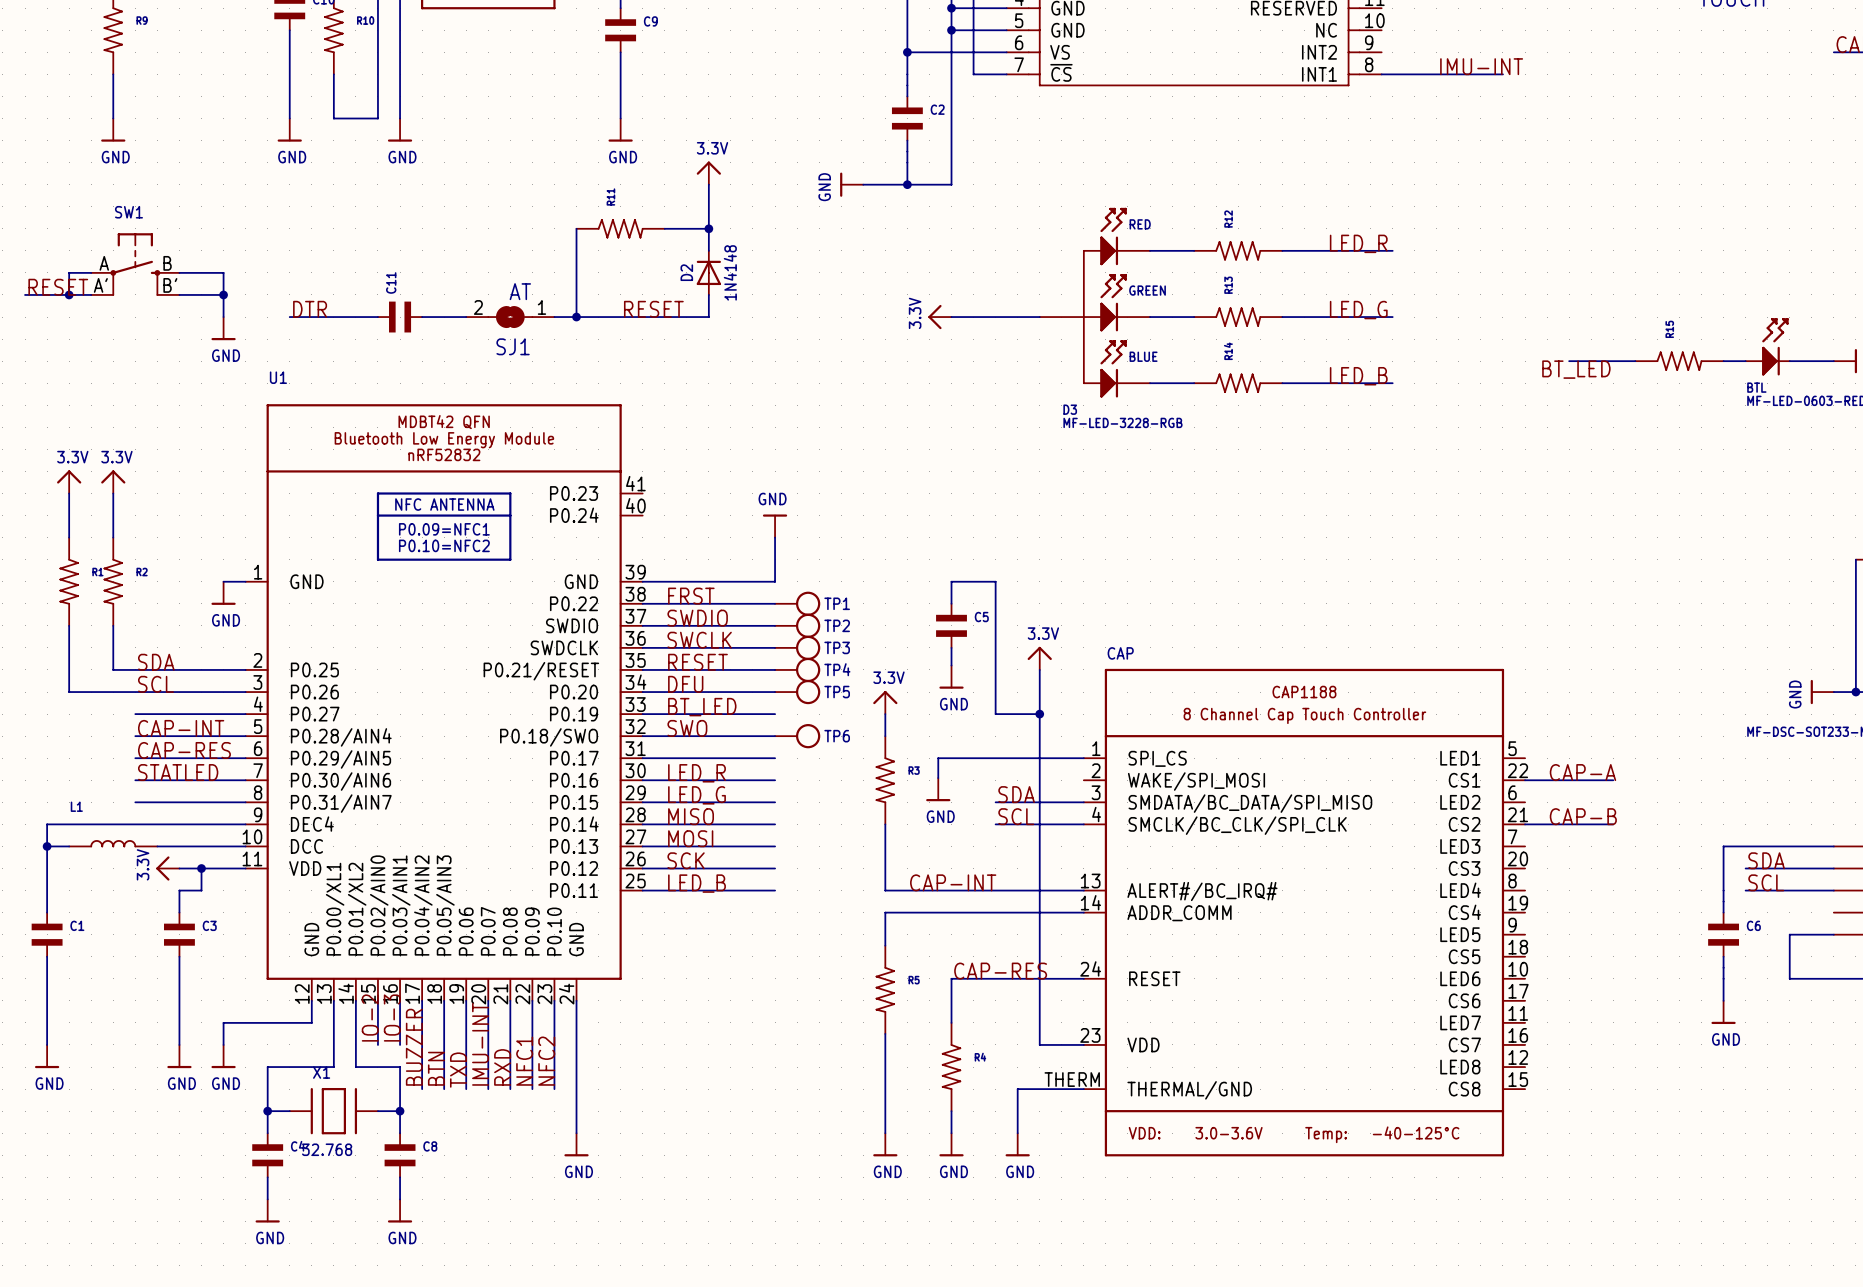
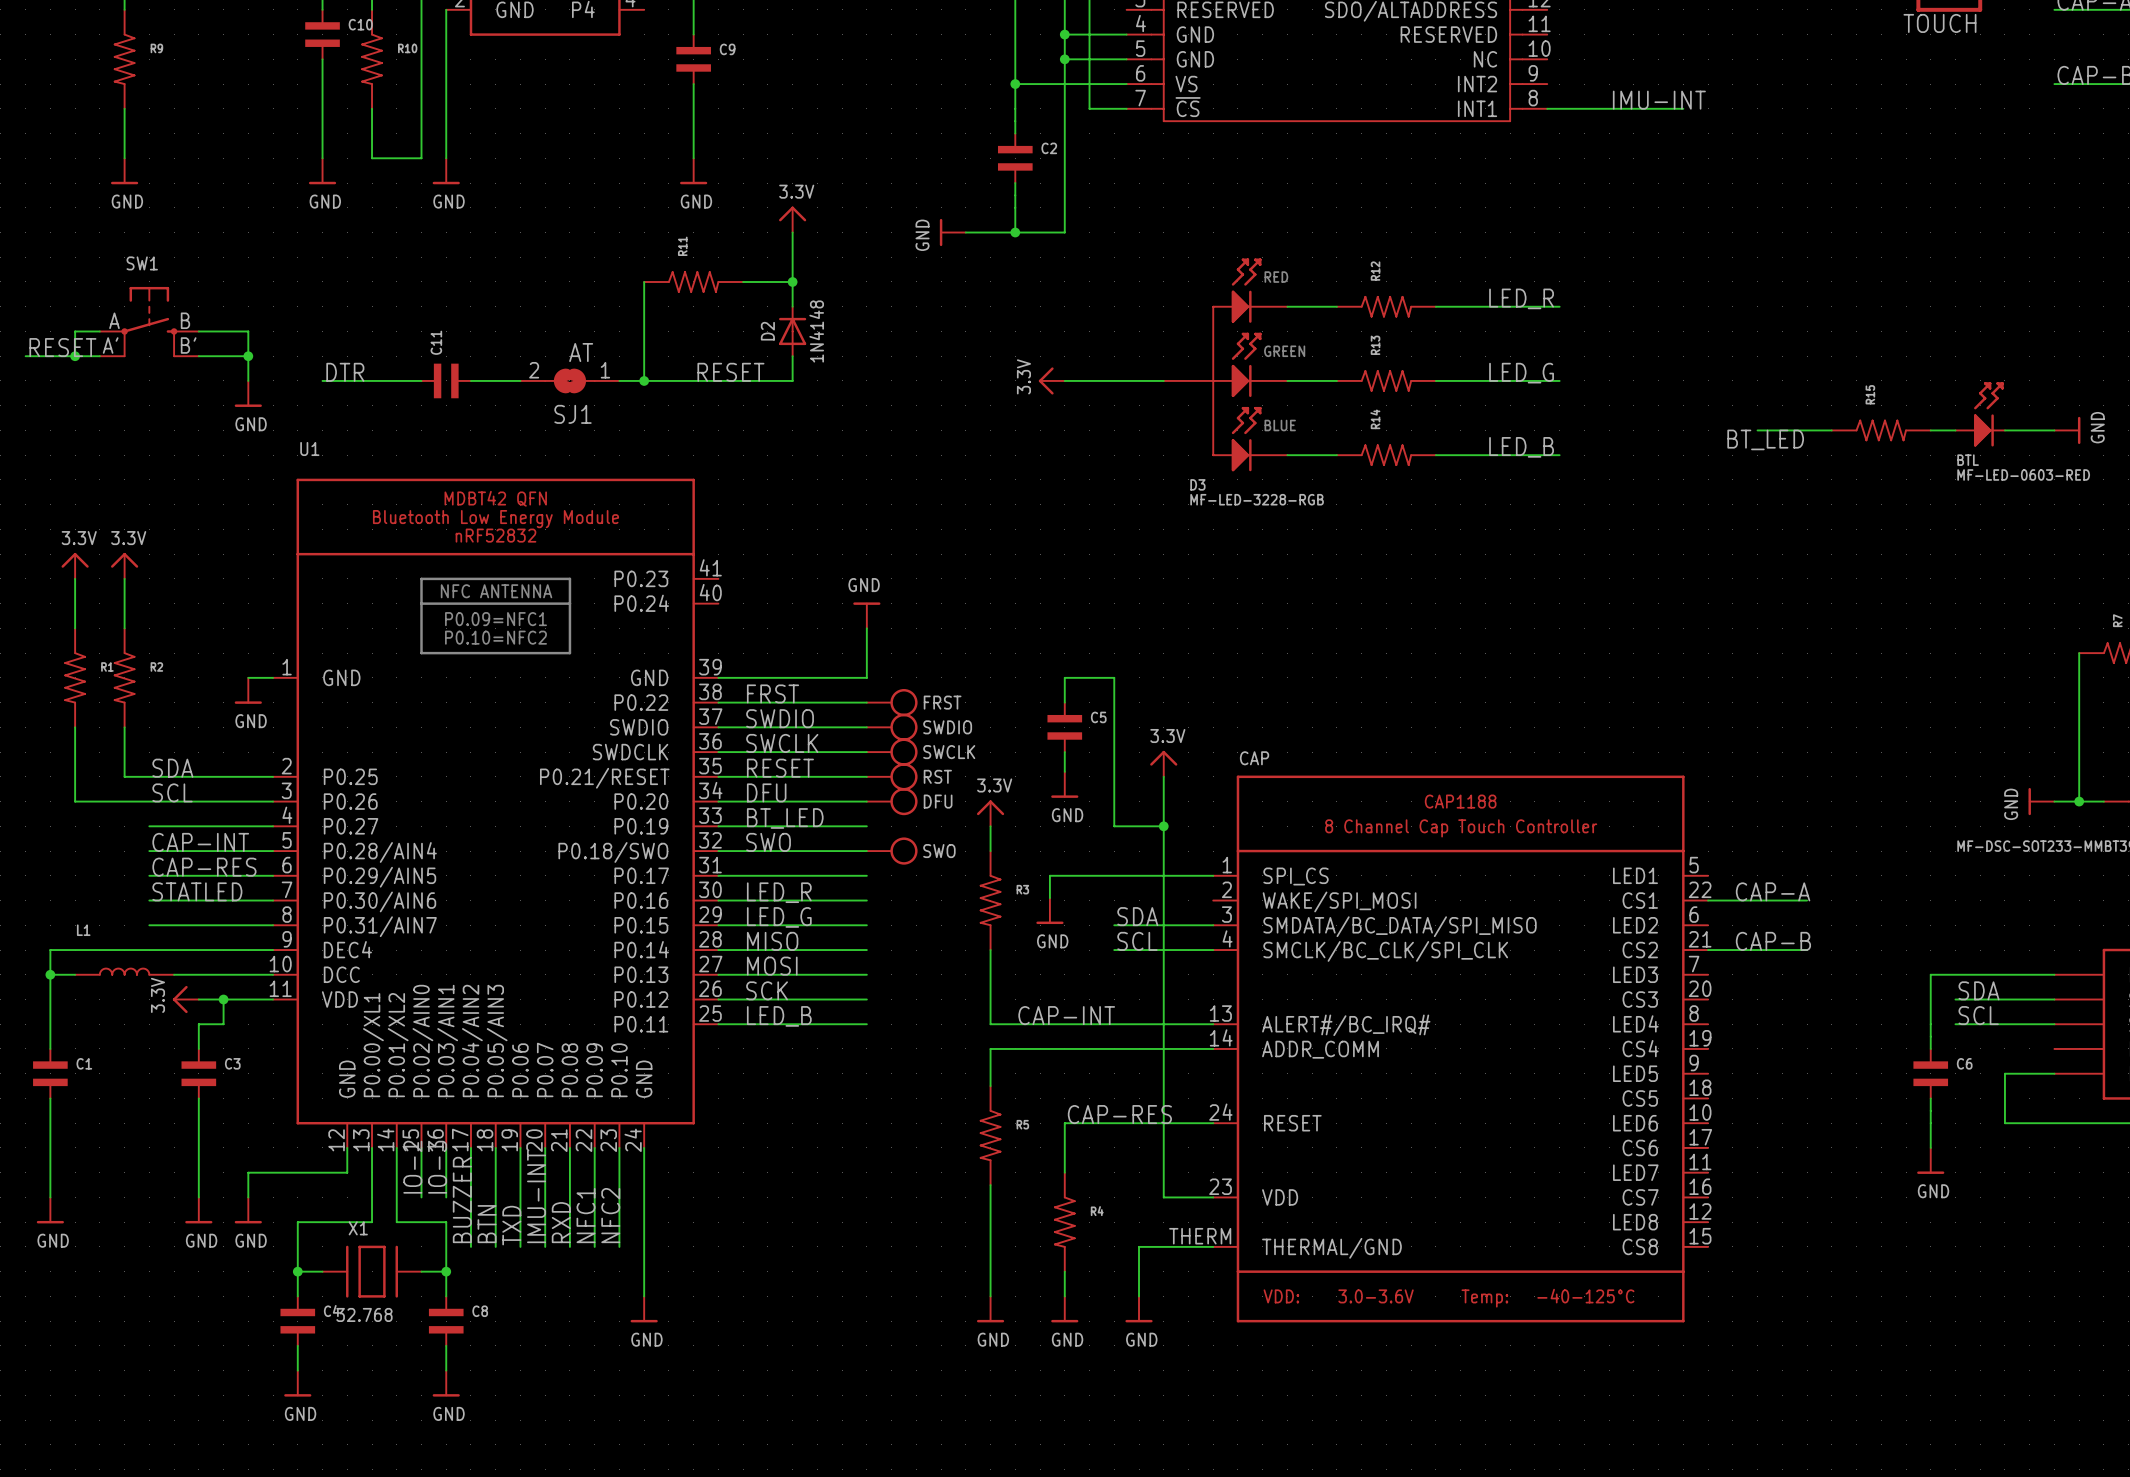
TP1 name: TP1 (837, 603) -> FRST (942, 702)
TP2 name: TP2 (837, 625) -> SWDIO (947, 727)
TP3 name: TP3 (837, 647) -> SWCLK (949, 752)
TP4 name: TP4 (837, 669) -> RST (937, 776)
TP5 name: TP5 (837, 692) -> DFU (938, 801)
TP6 name: TP6 (837, 736) -> SWO (939, 851)

